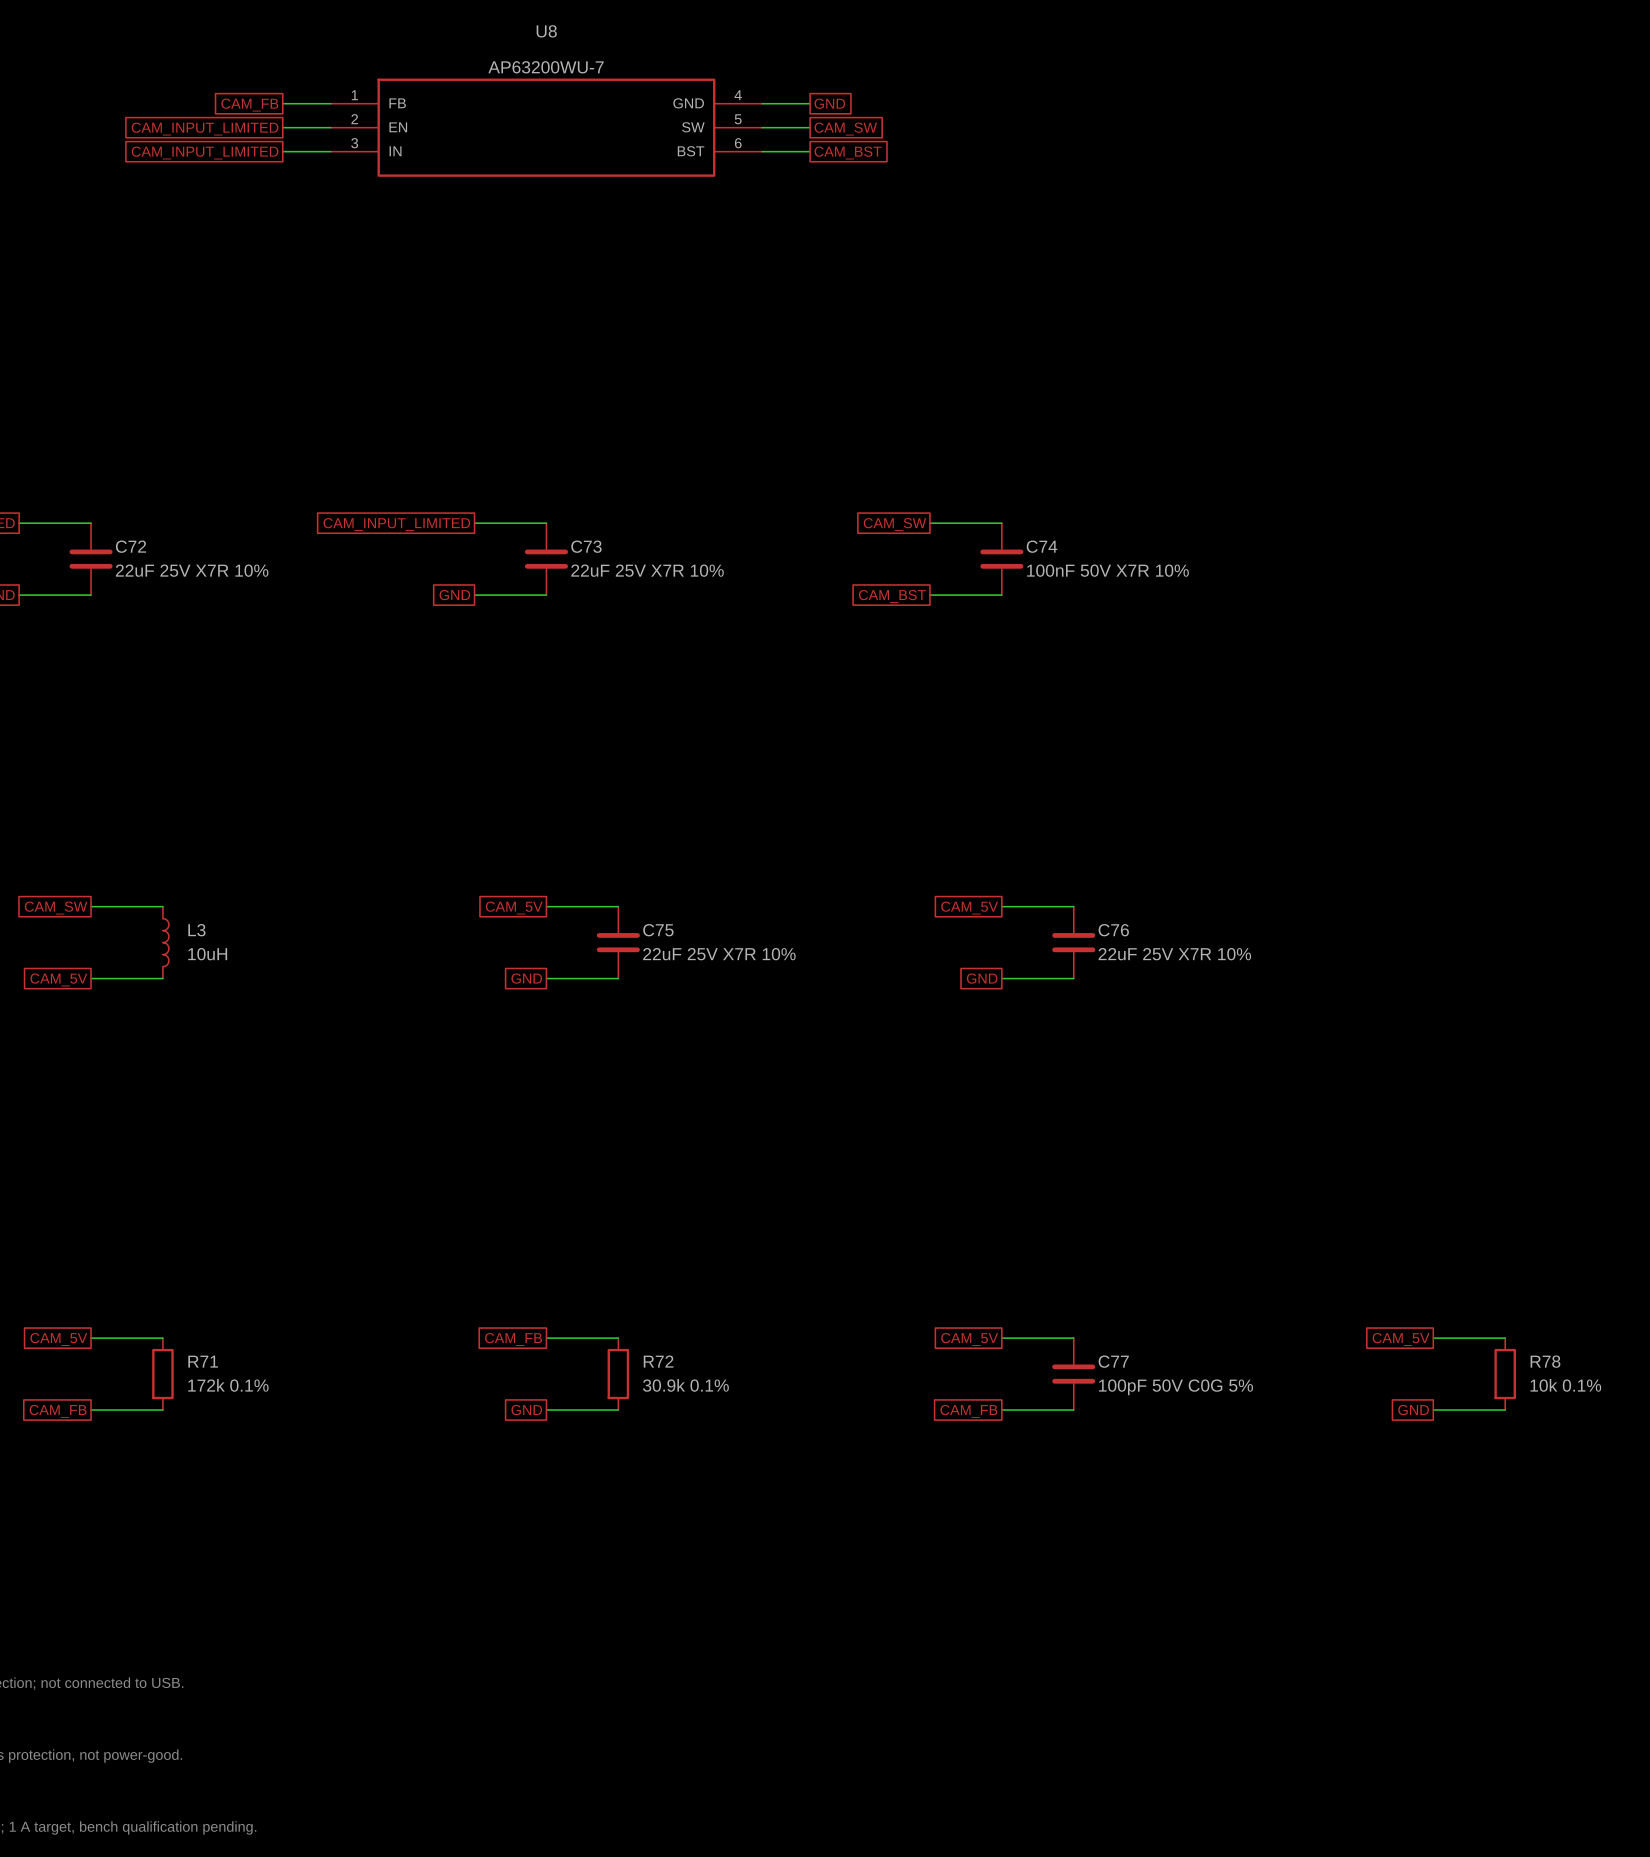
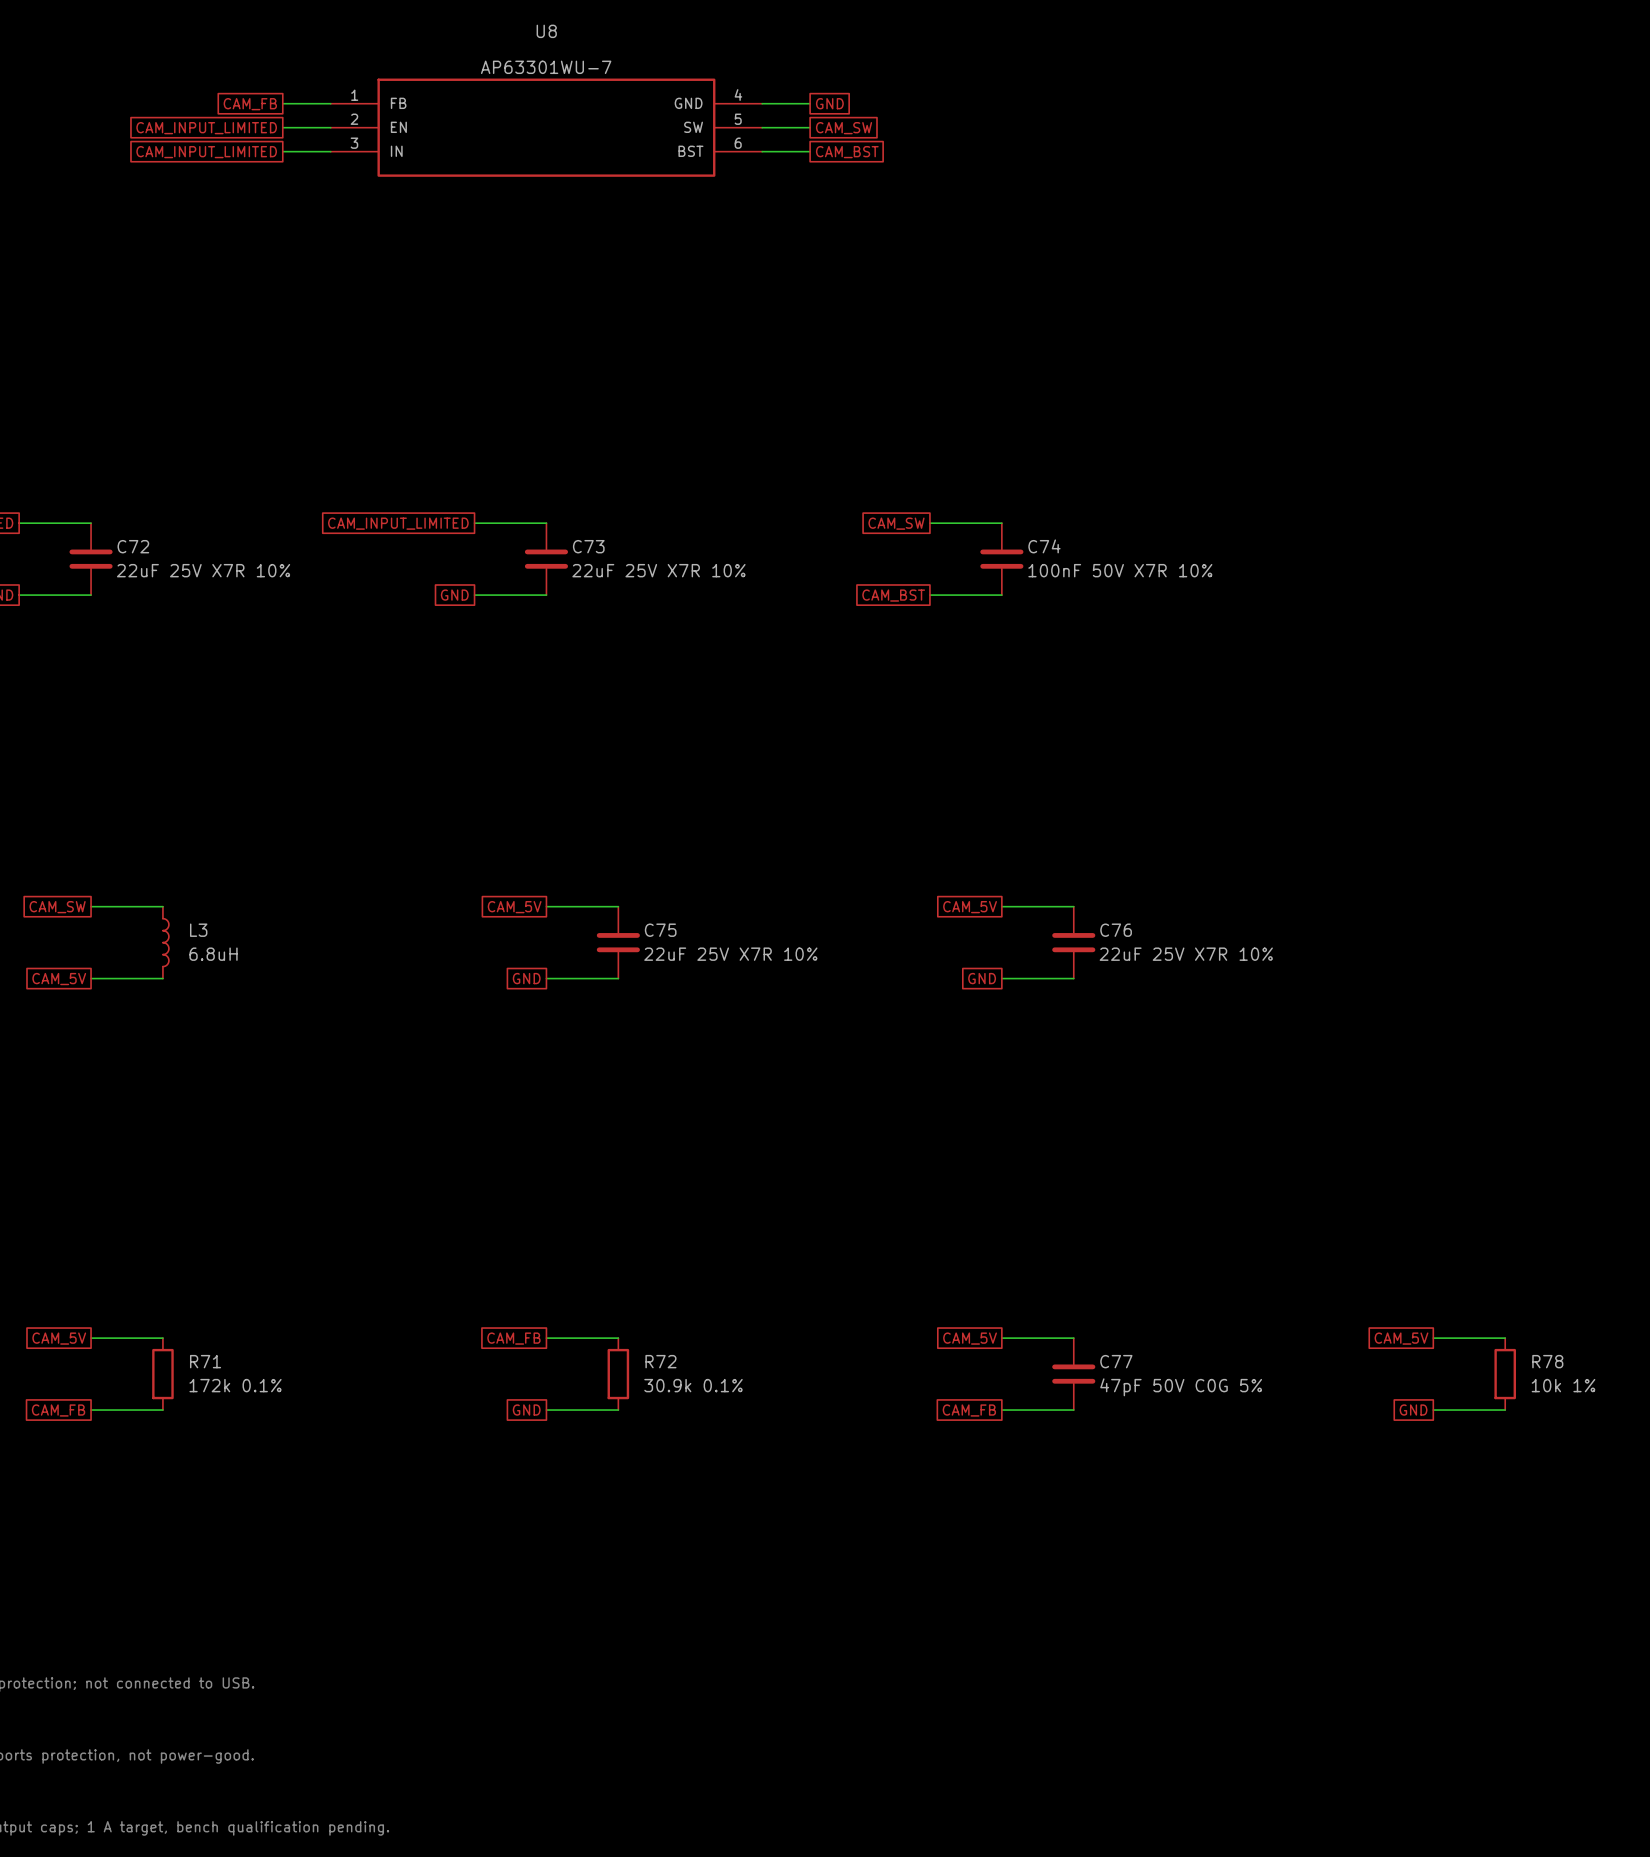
U8 value: AP63200WU-7 (546, 67) -> AP63301WU-7 (546, 67)
L3 value: 10uH (207, 954) -> 6.8uH (213, 954)
R78 value: 10k 0.1% (1565, 1385) -> 10k 1% (1563, 1385)
C77 value: 100pF 50V C0G 5% (1176, 1387) -> 47pF 50V C0G 5% (1181, 1387)

